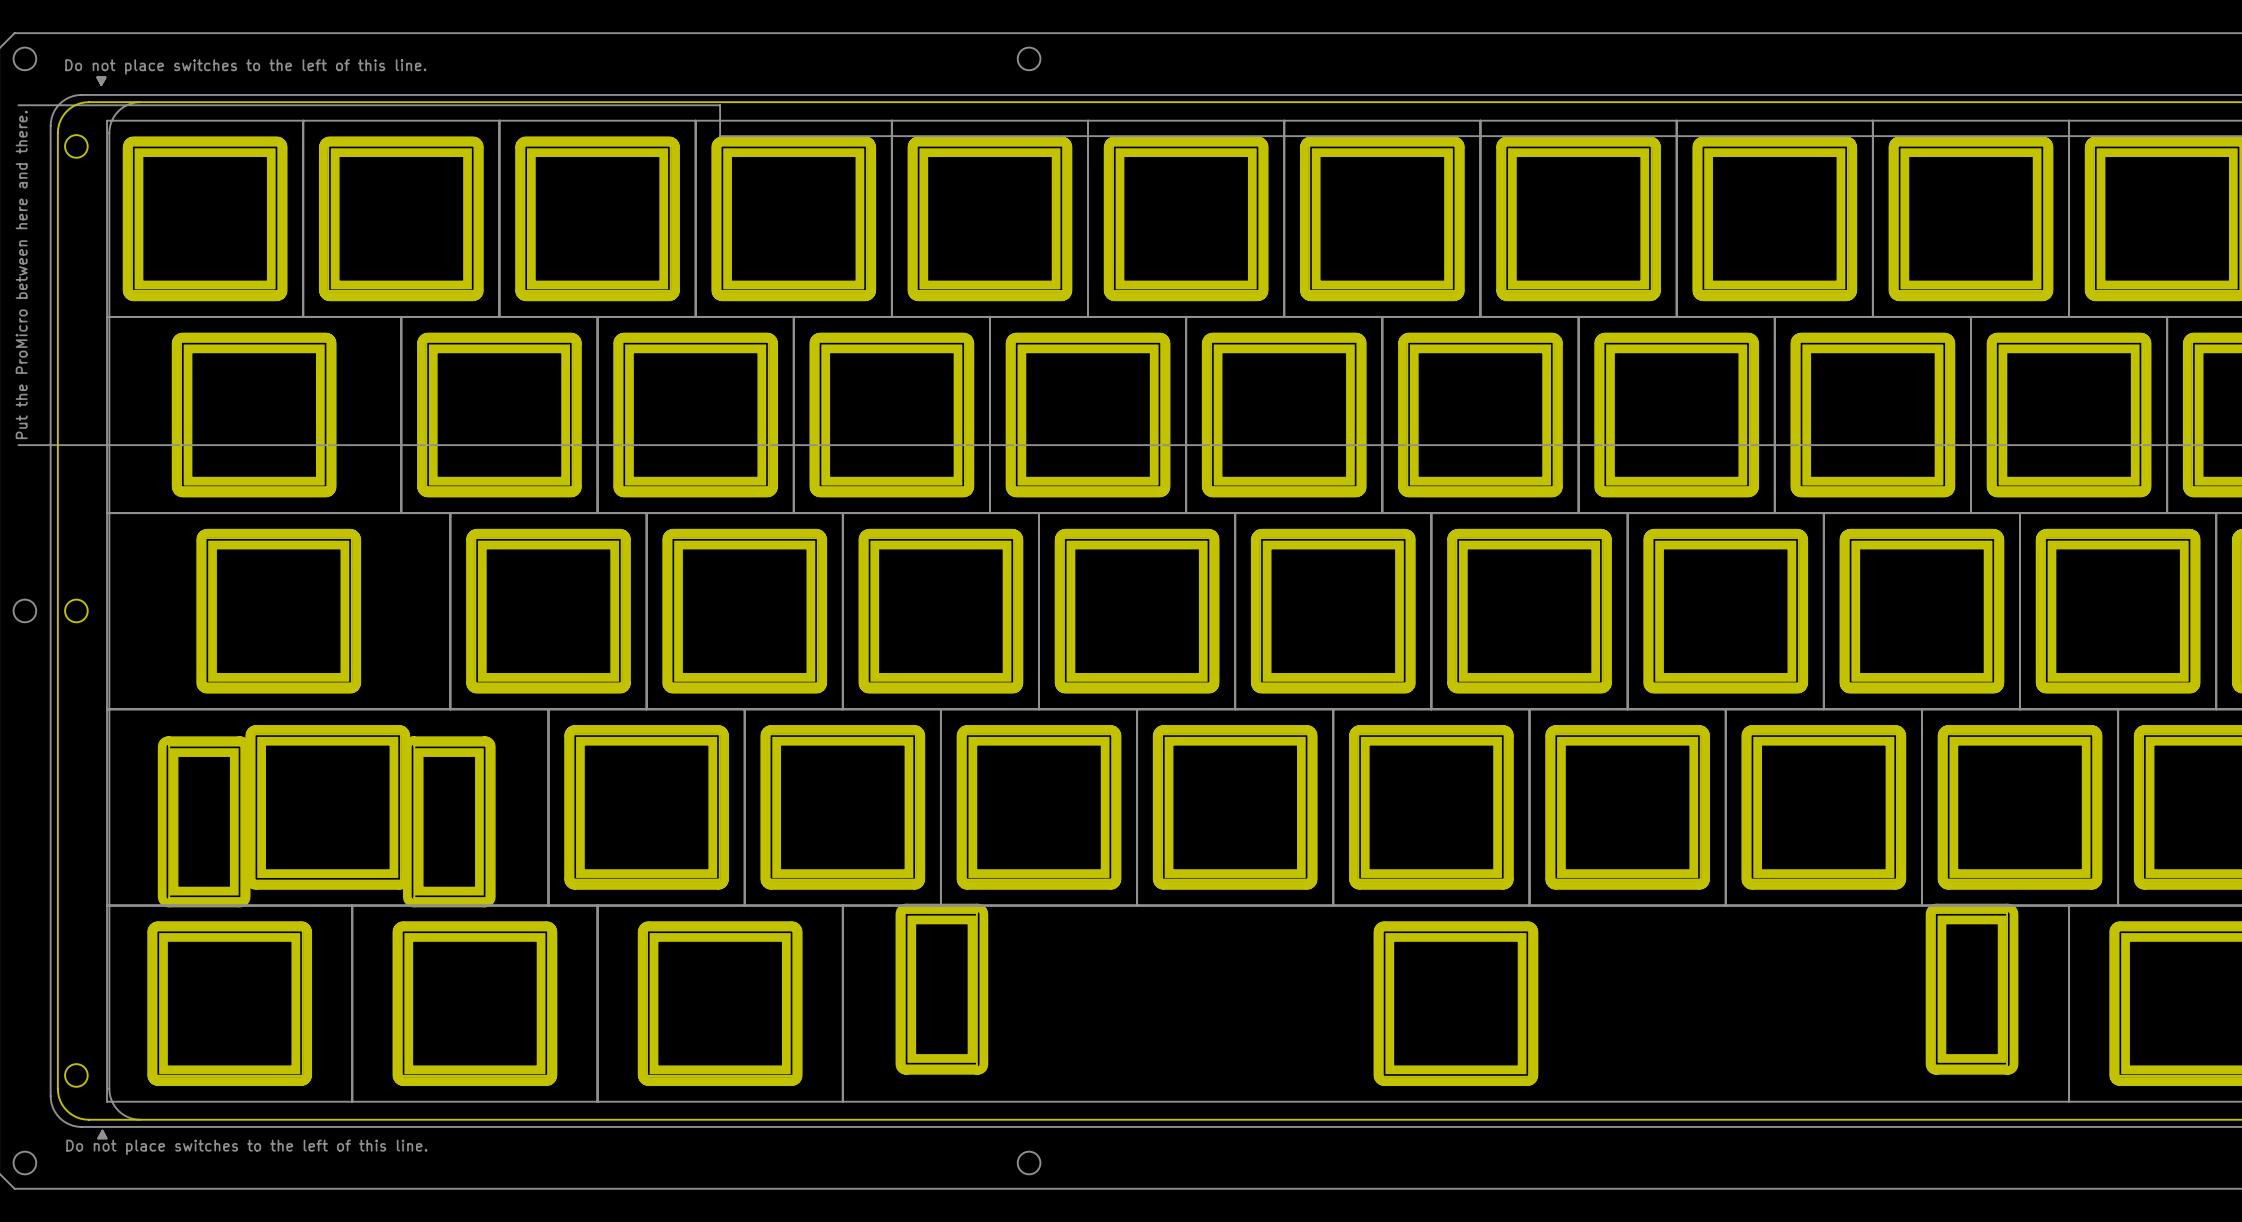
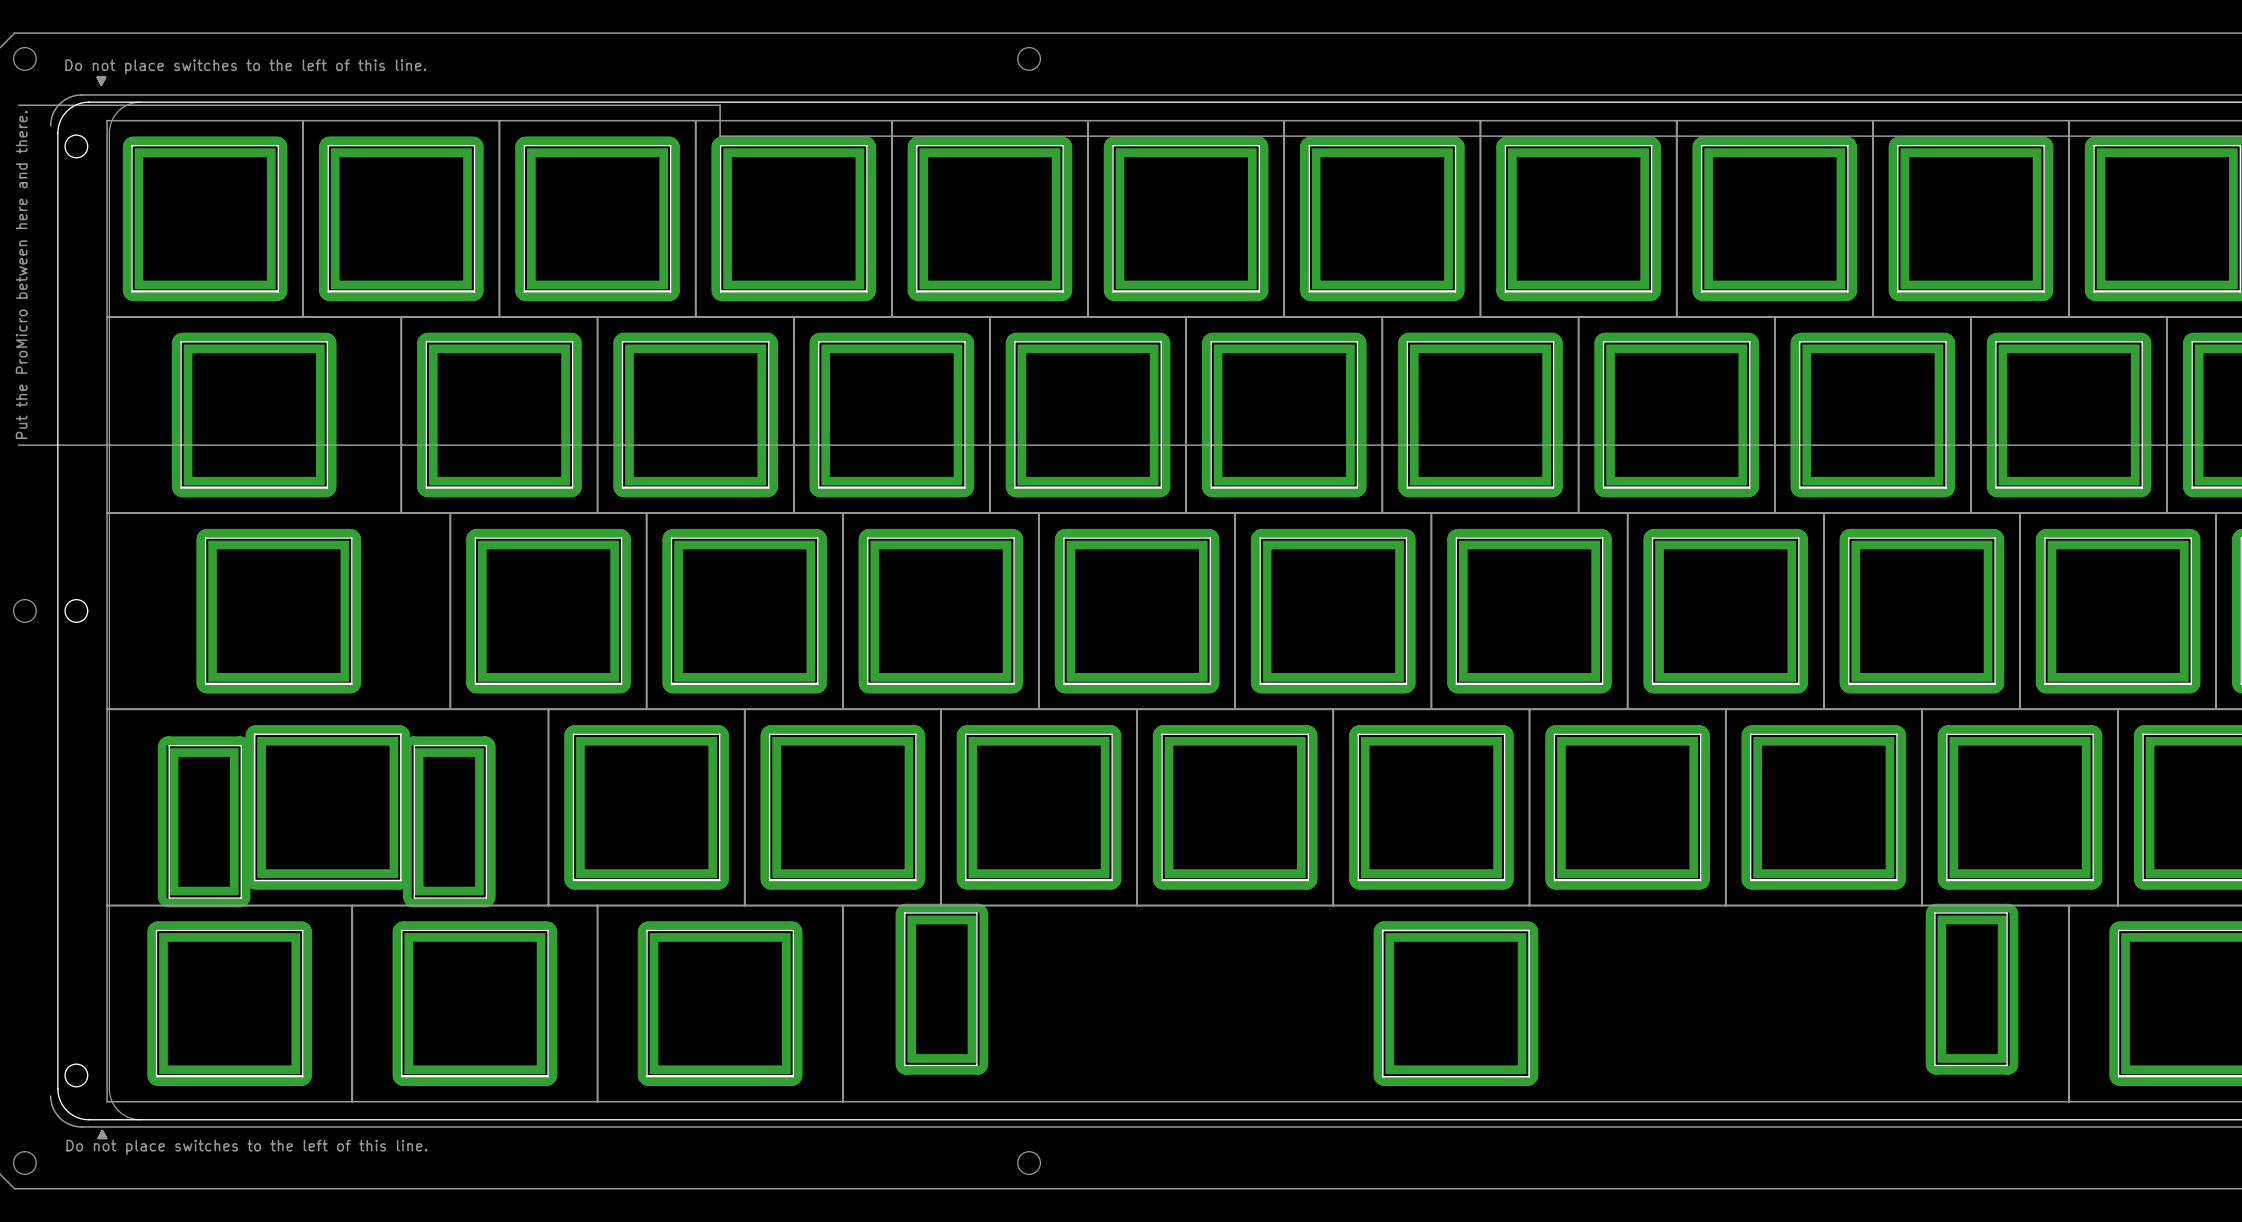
line: (50, 125) (50, 1096) -> none

